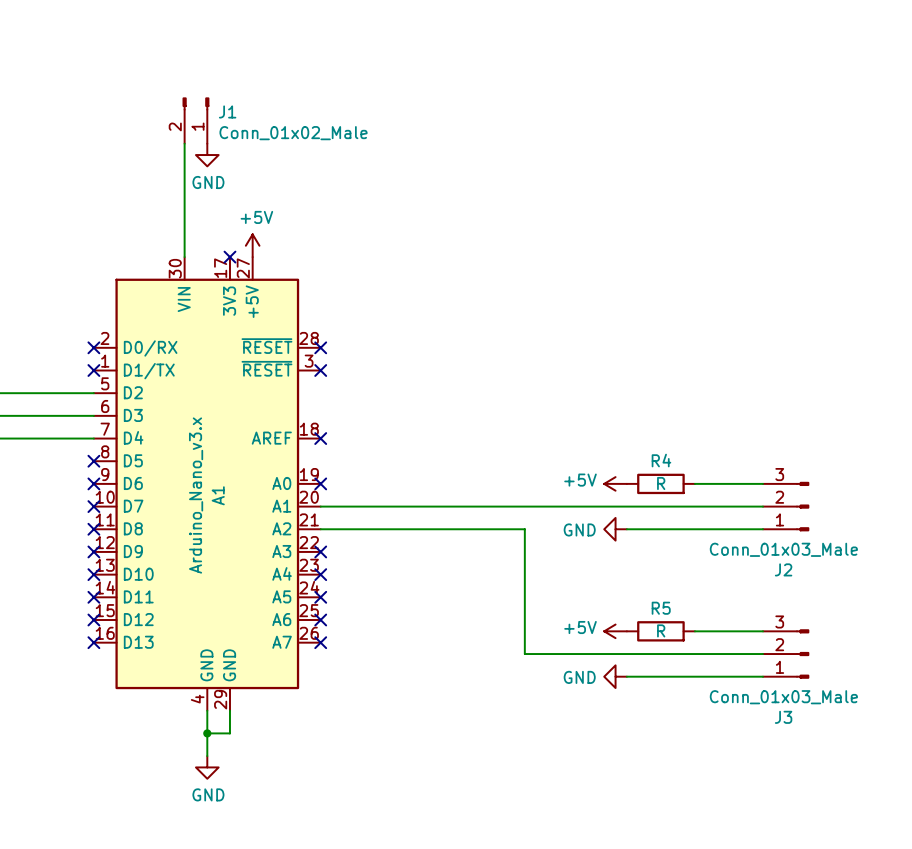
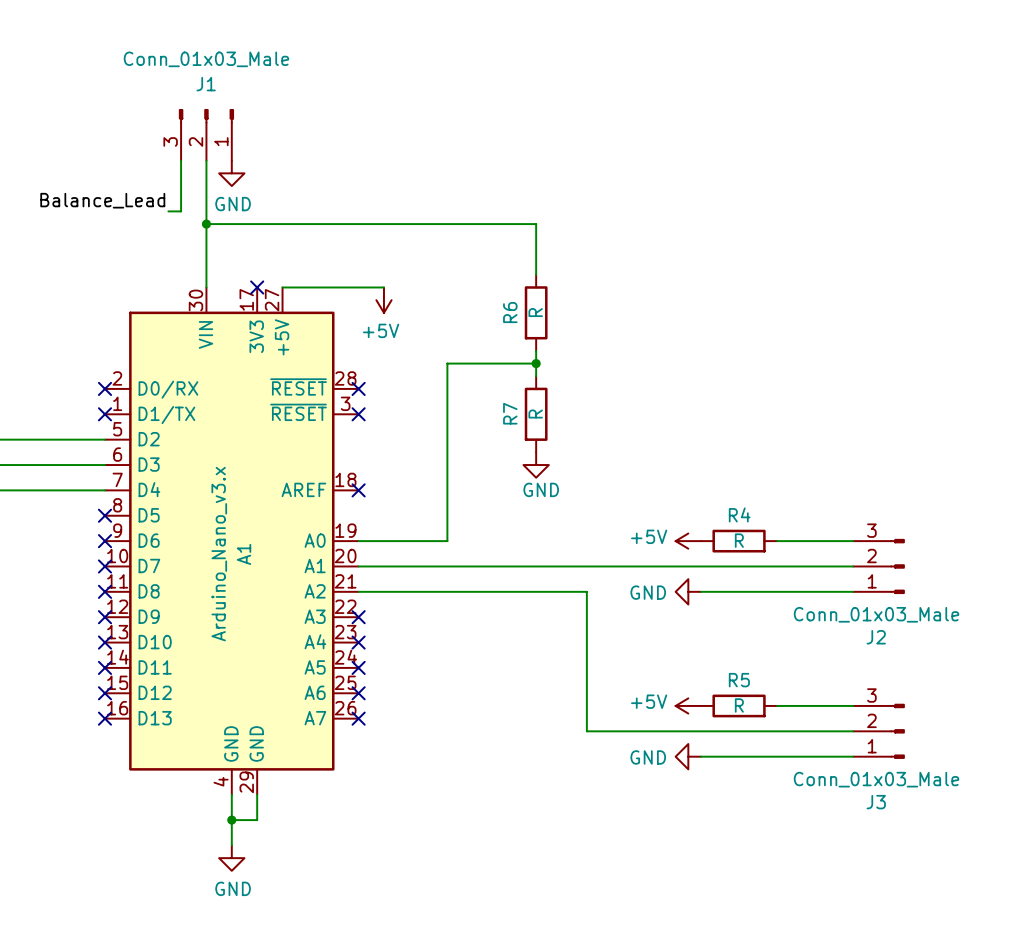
J1 symbol: [182, 97, 210, 144] -> [179, 109, 234, 161]
J1 name position: J1 (227, 111) -> J1 (206, 84)
J1 value: Conn_01x02_Male (293, 133) -> Conn_01x03_Male (206, 59)
wire: none -> (181, 160) (181, 211) (168, 211)
label: none -> Balance_Lead (102, 200)
wire: none -> (206, 224) (536, 224) (536, 274)
junction: none -> (206, 224)
power symbol rotation: 0° (252, 245) -> 180° (383, 300)
power symbol position: +5V (252, 245) -> +5V (383, 300)
wire: none -> (282, 287) (383, 287)
R6: none -> R (536, 312)
wire: none -> (536, 350) (536, 376)
wire: none -> (536, 363) (447, 363) (447, 541) (358, 541)
junction: none -> (536, 363)
R7: none -> R (536, 414)
power symbol: none -> GND (536, 465)
no-connect mark: (320, 483) -> none

